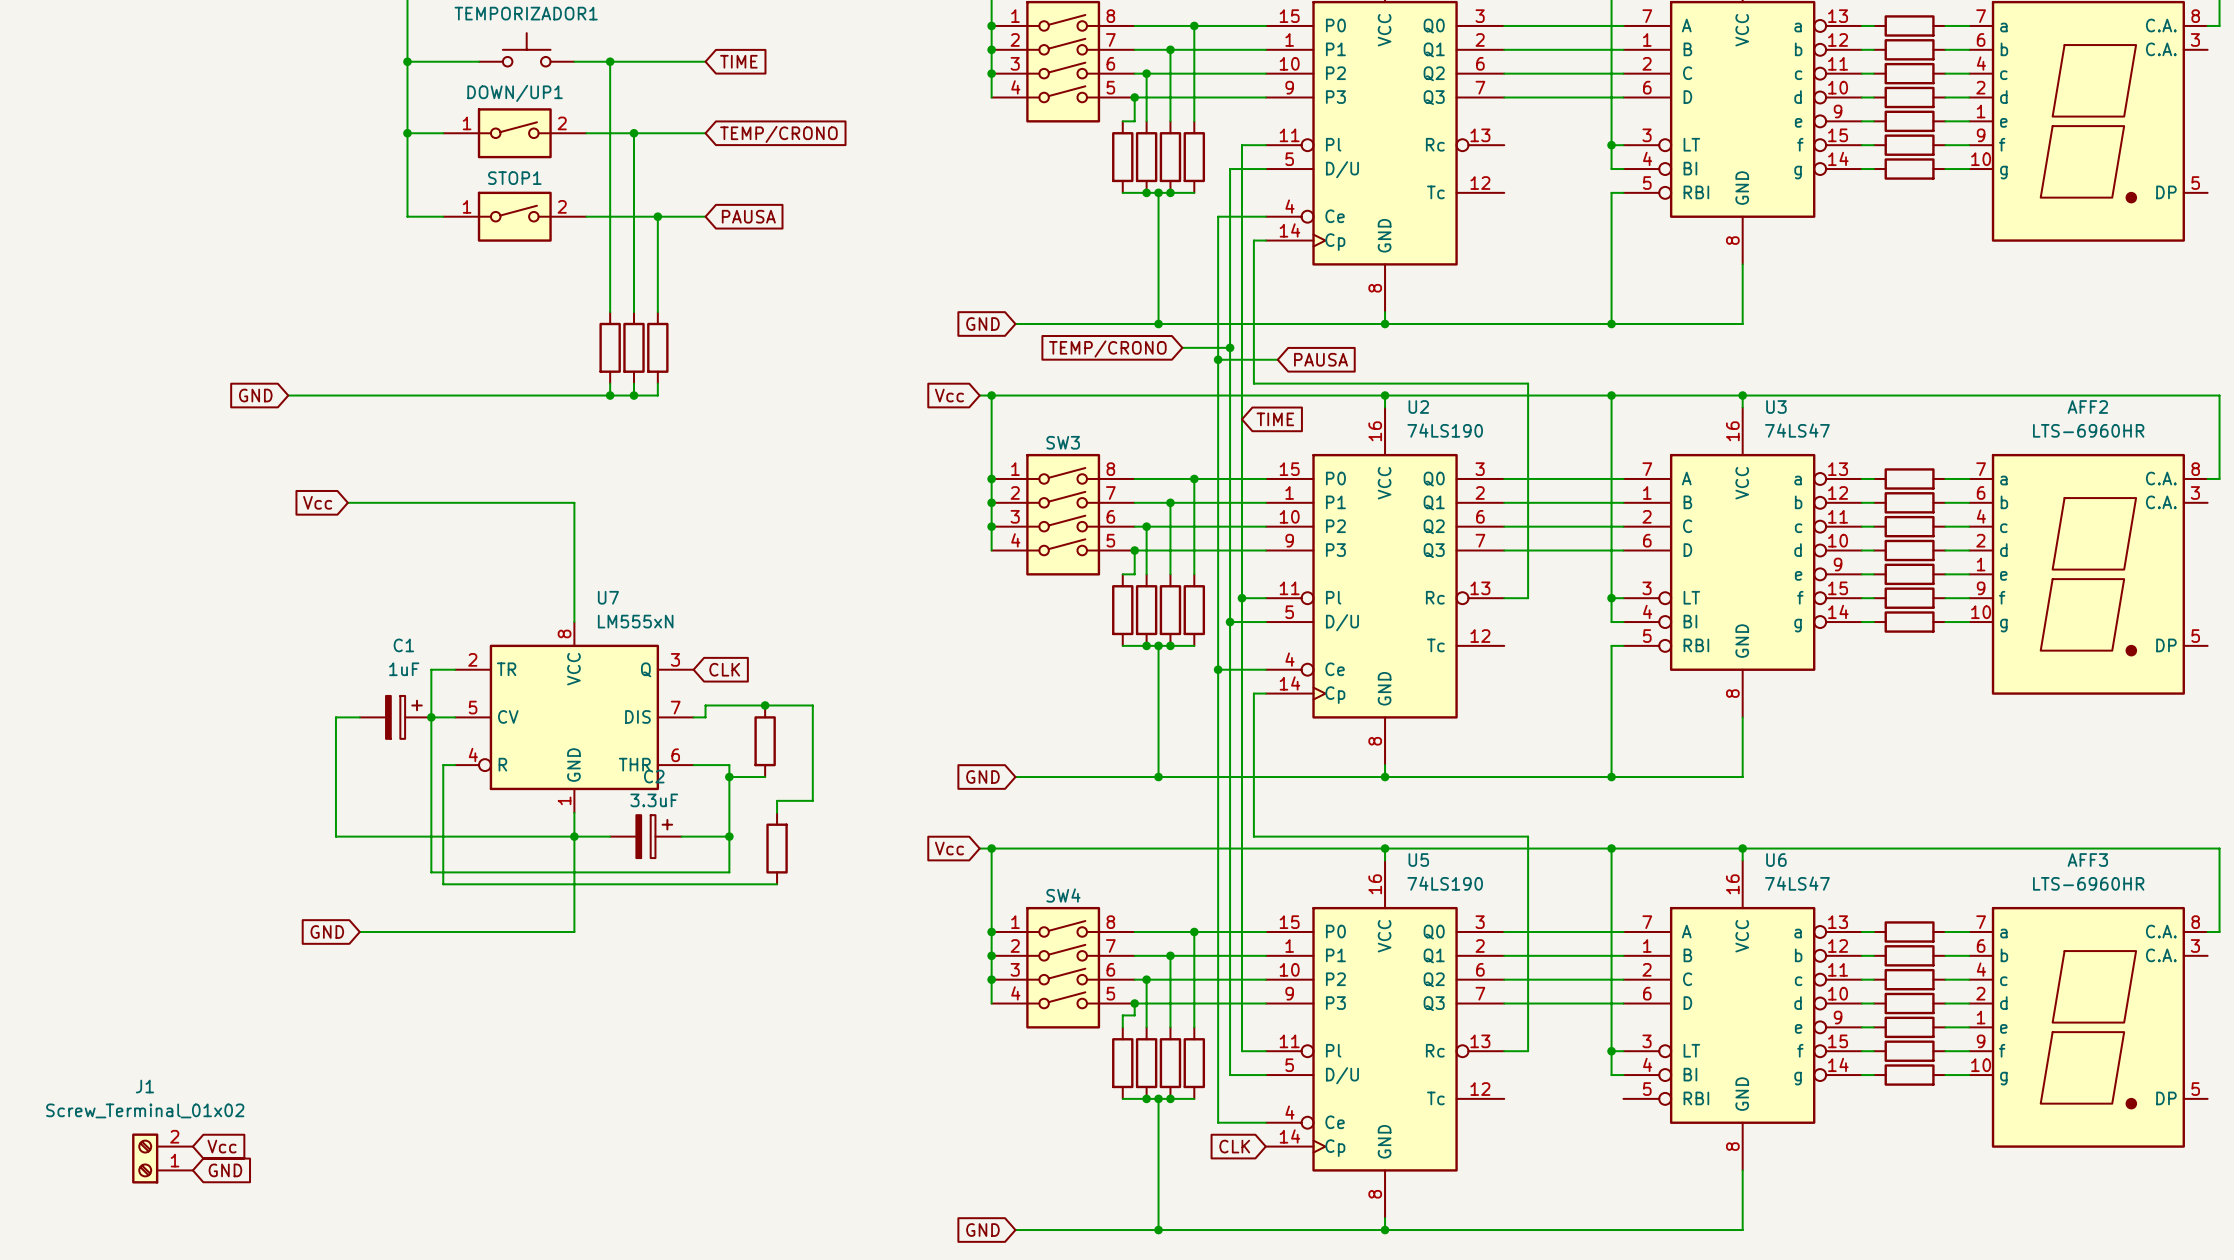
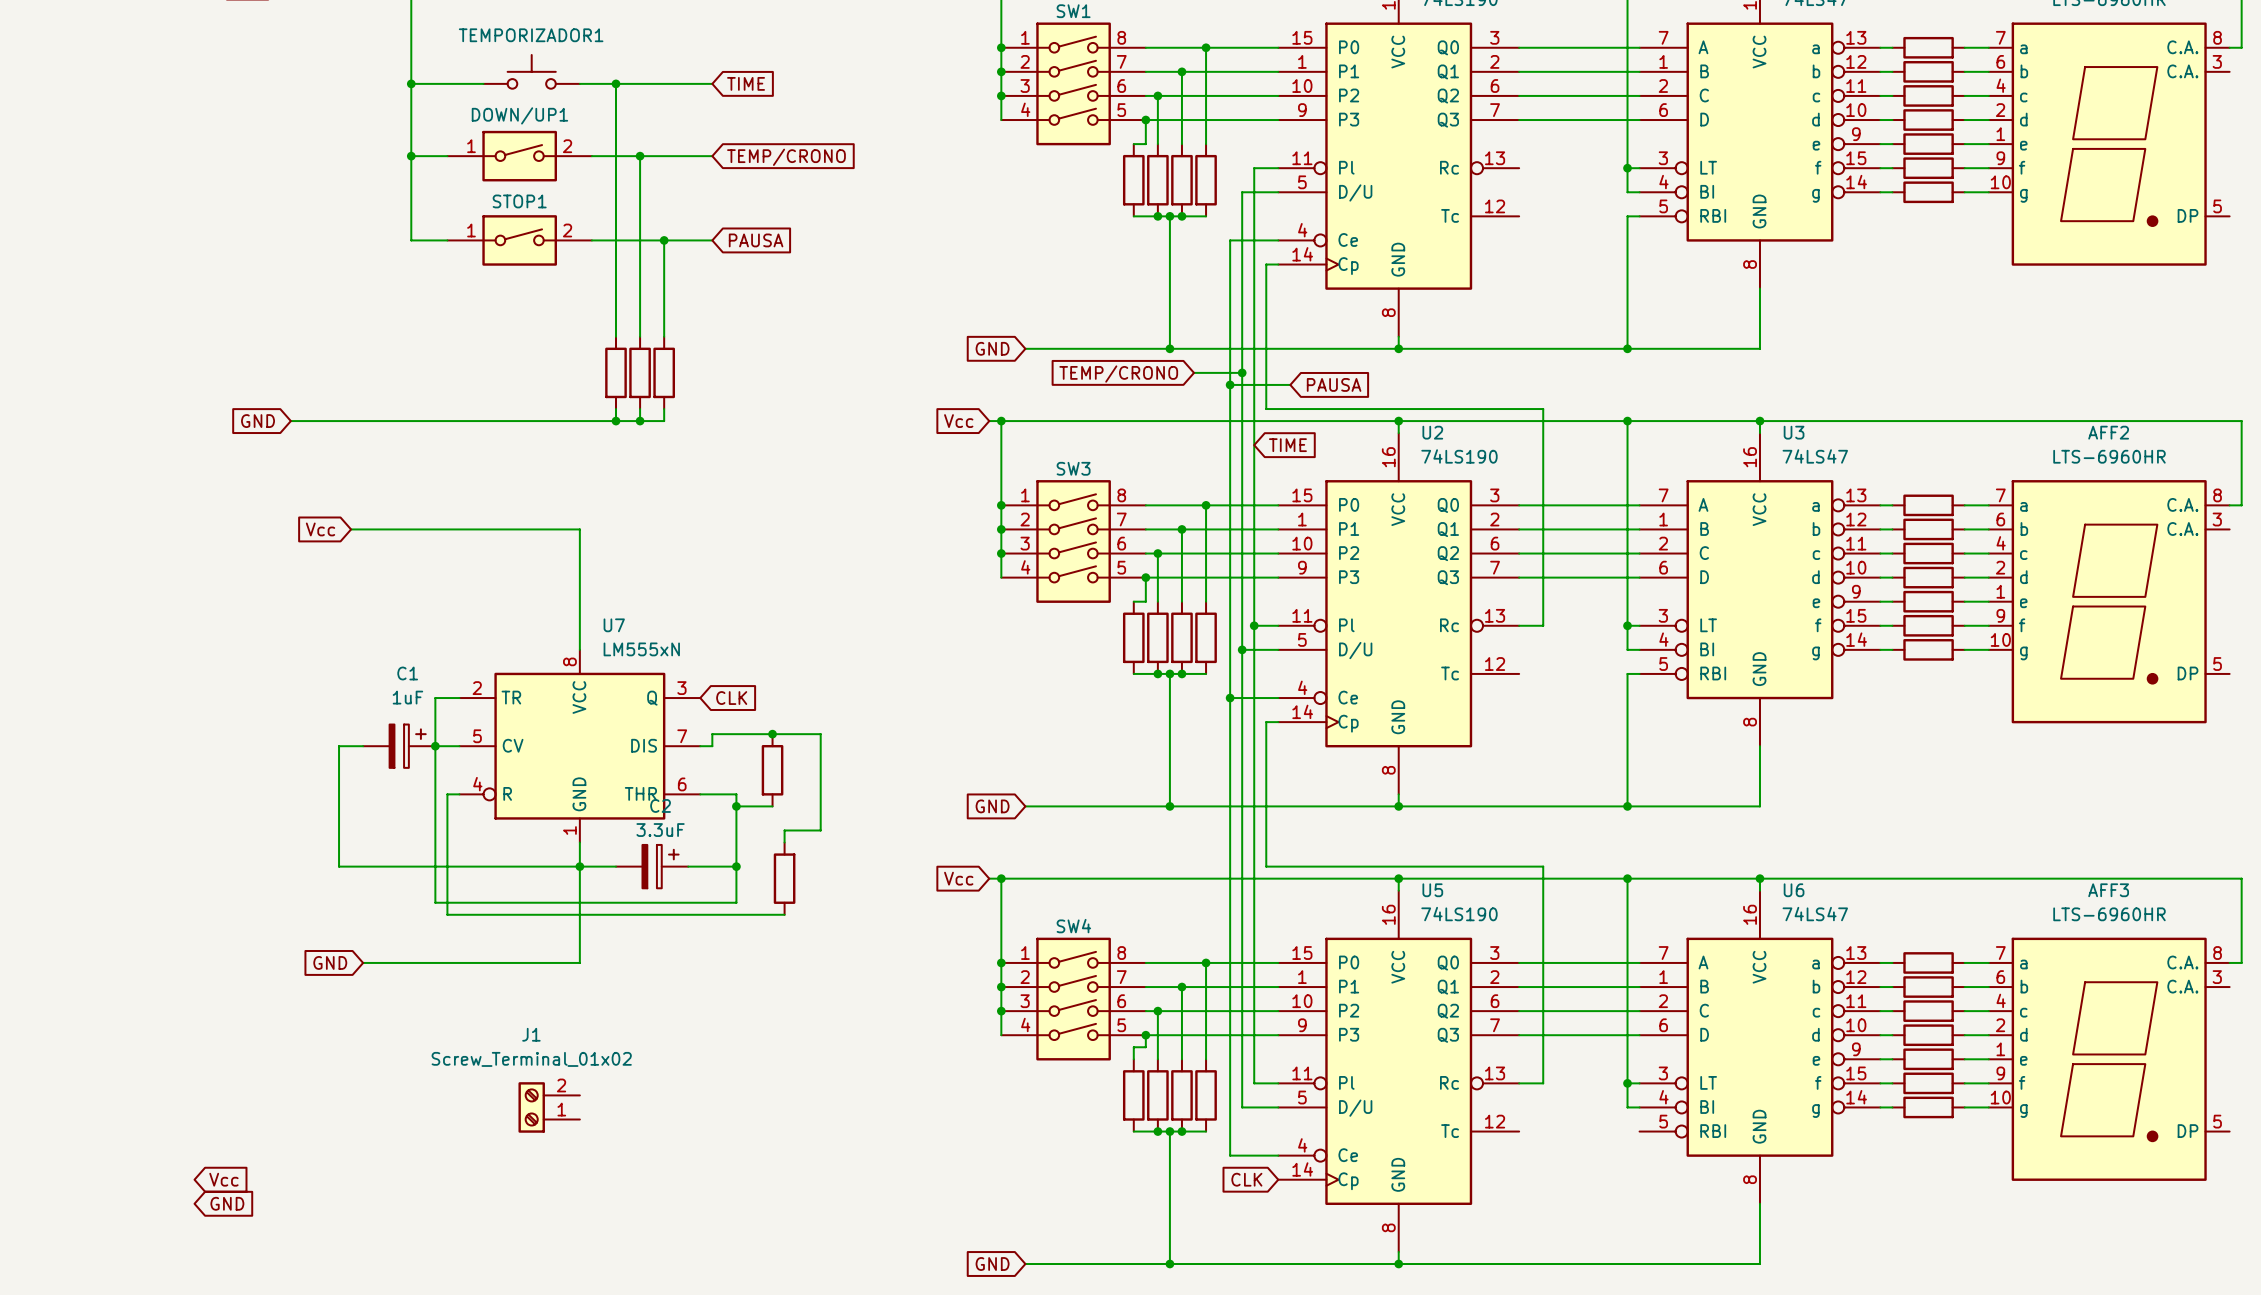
J1 position: (162, 1158) -> (549, 1107)

